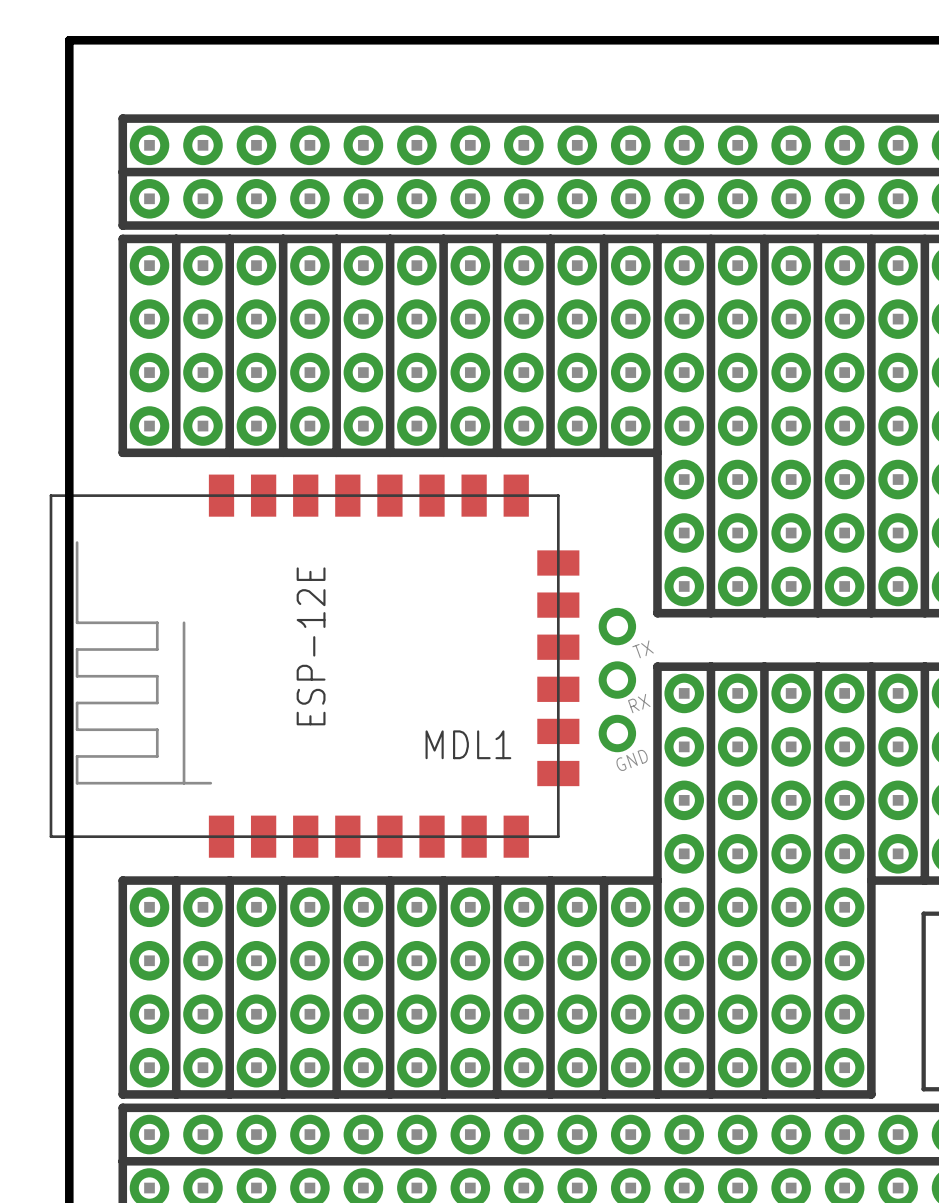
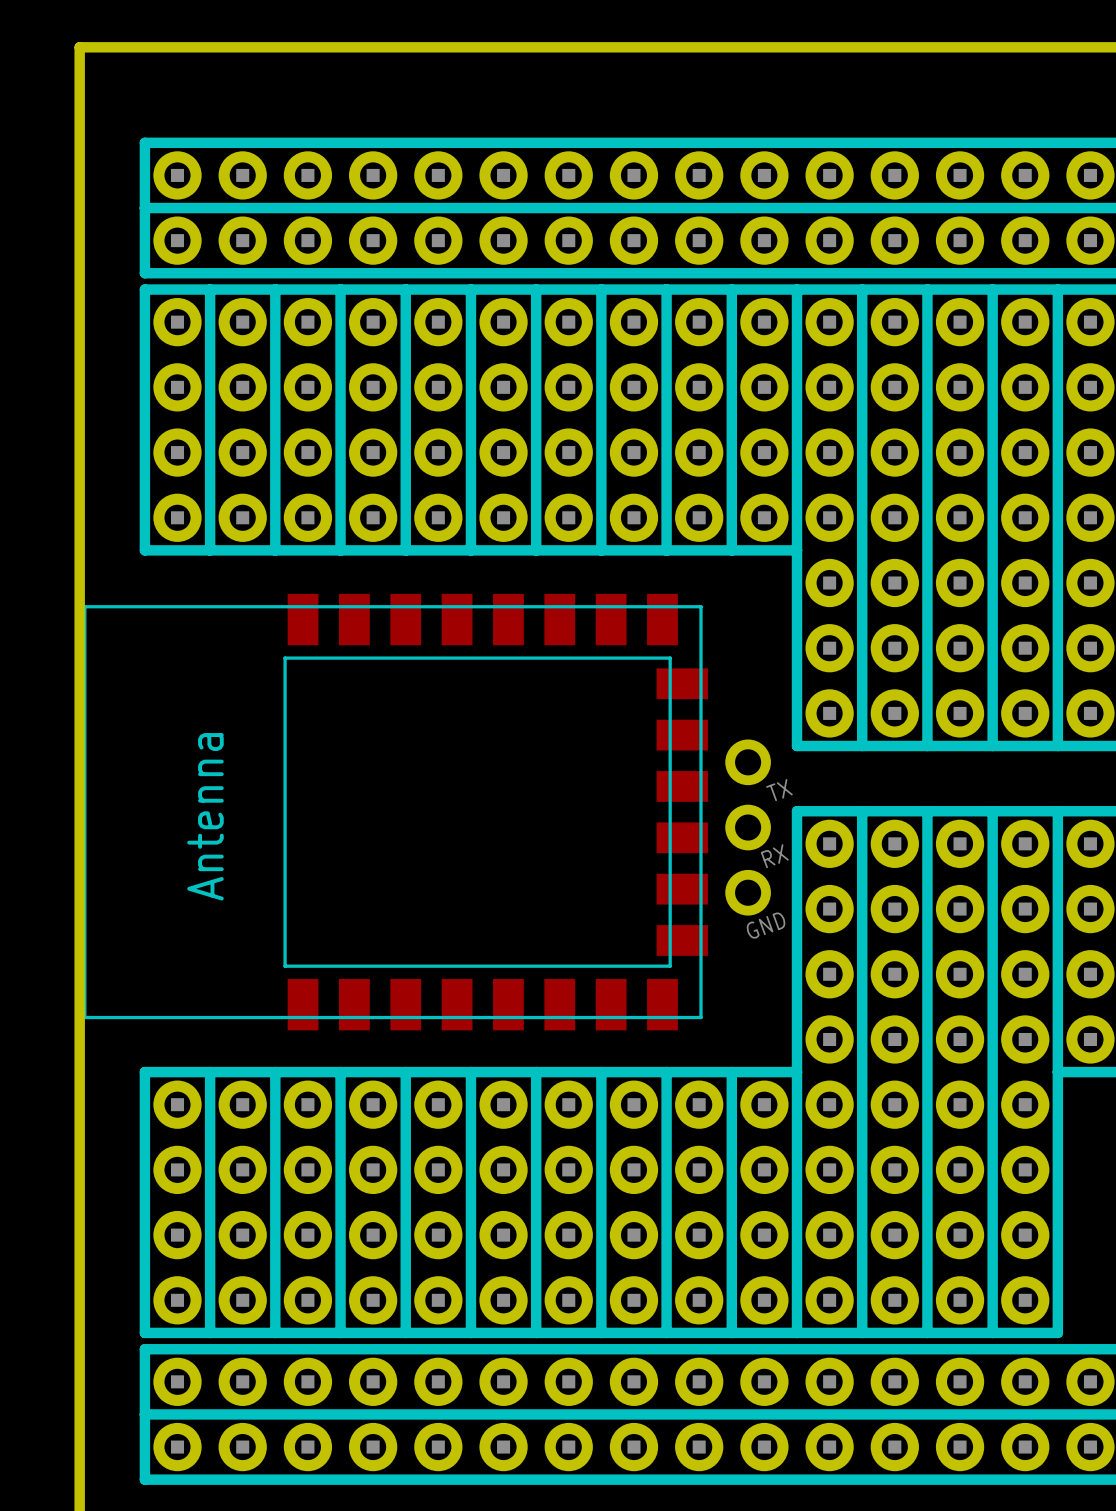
MDL1: (314, 666) -> none
part: none -> (395, 812)

